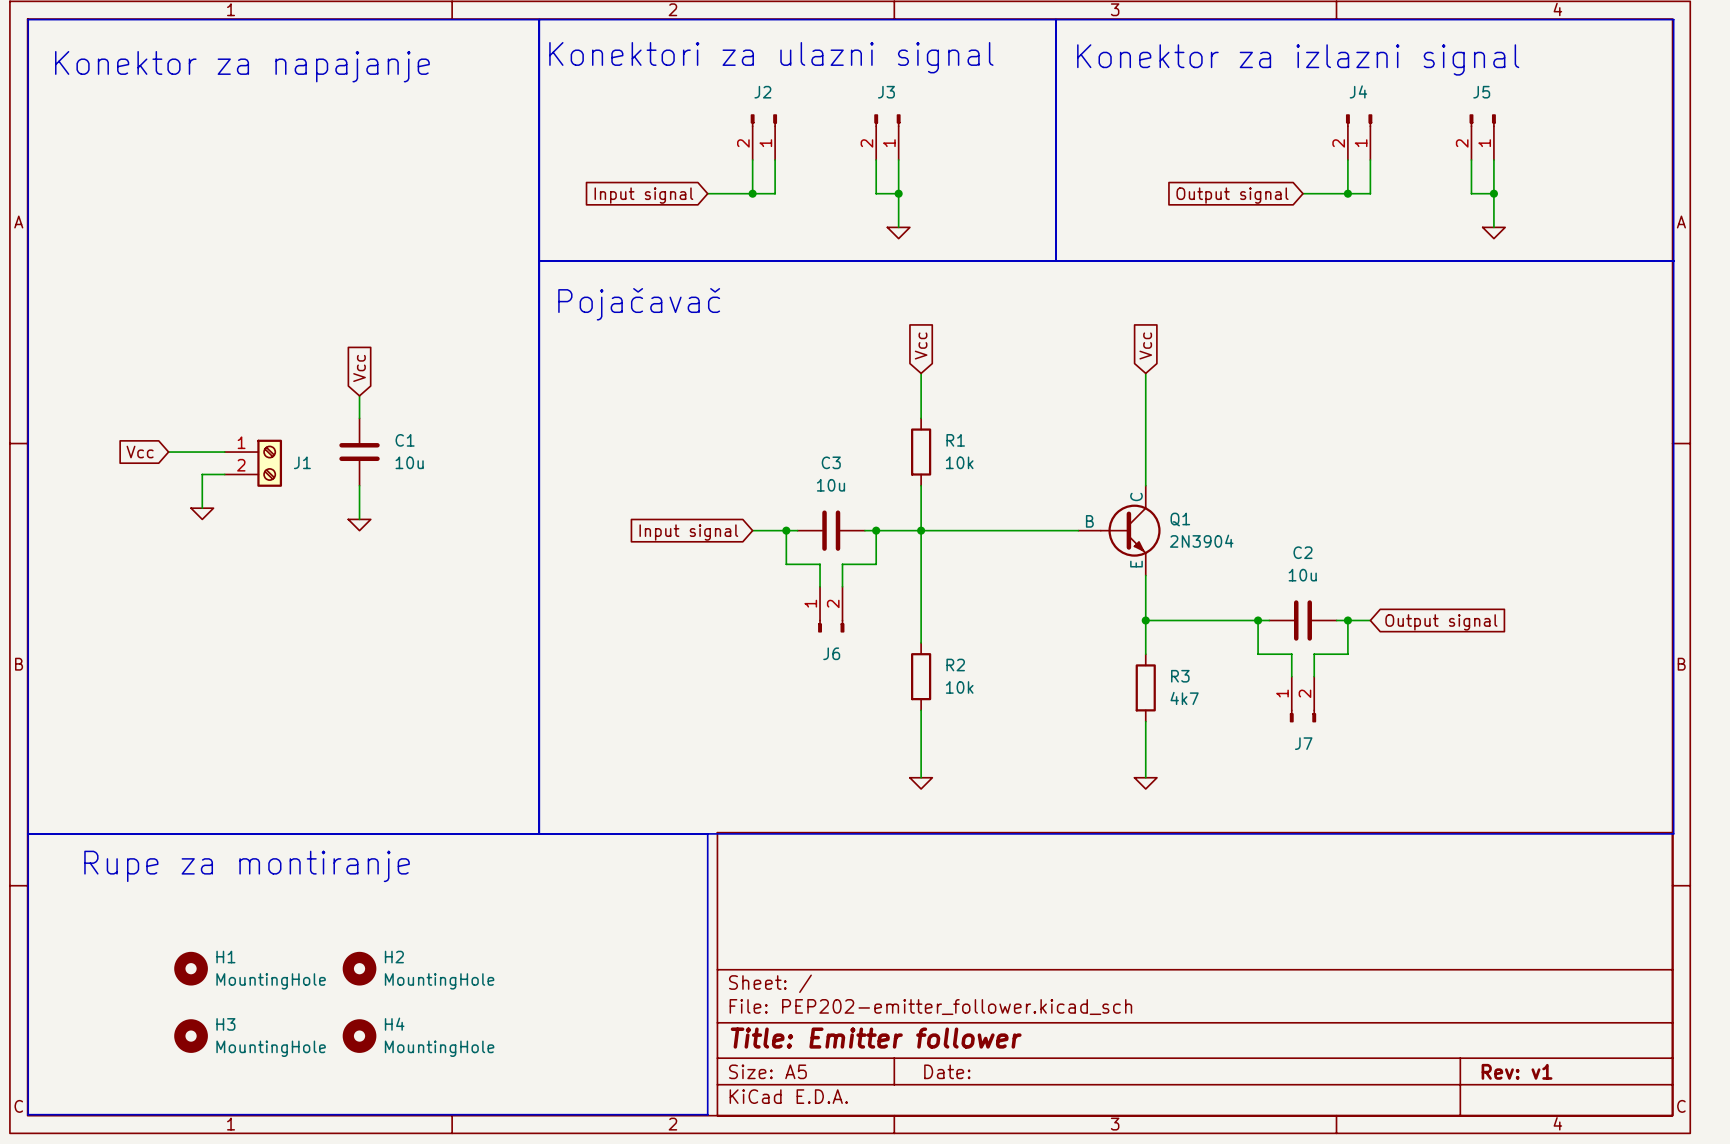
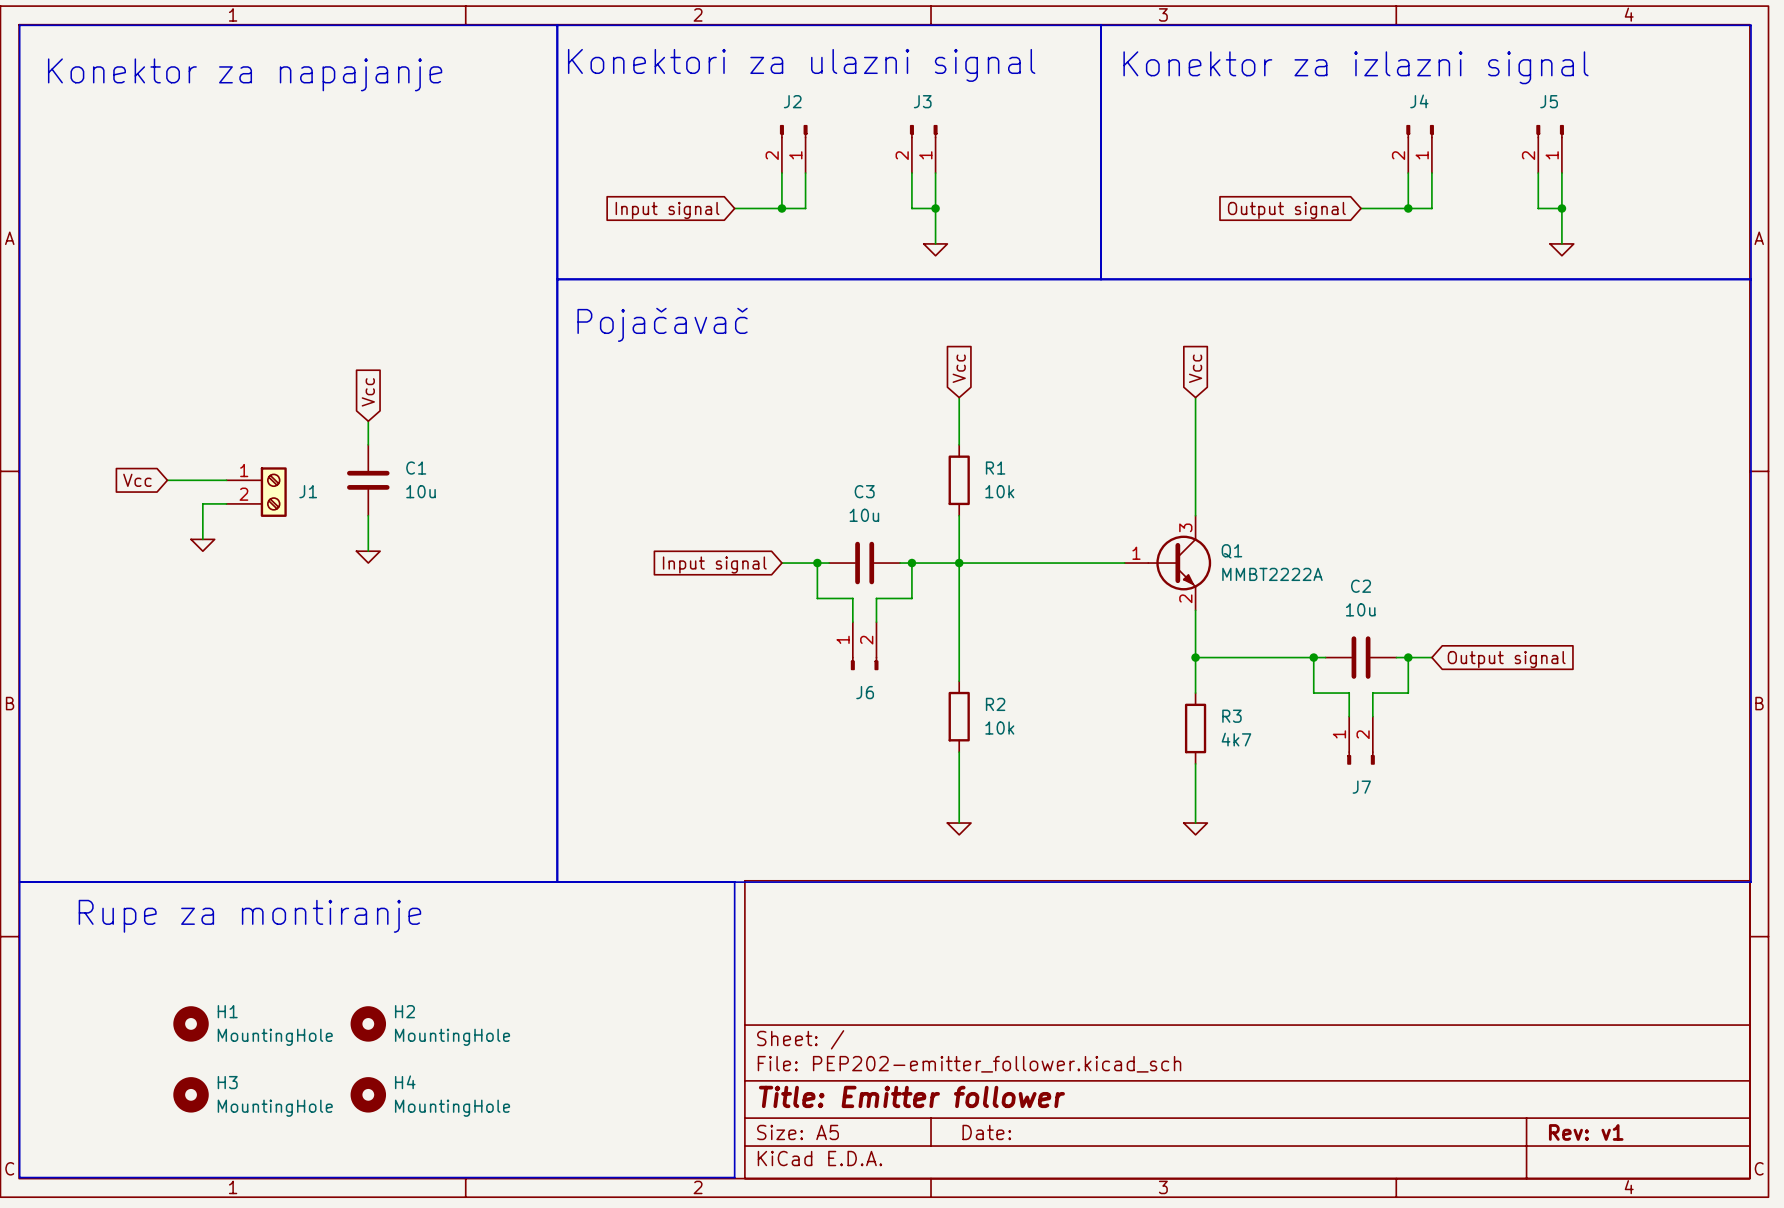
Q1 symbol: [1078, 485, 1161, 576] -> [1124, 515, 1212, 611]
Q1 value: 2N3904 (1201, 541) -> MMBT2222A (1272, 574)

